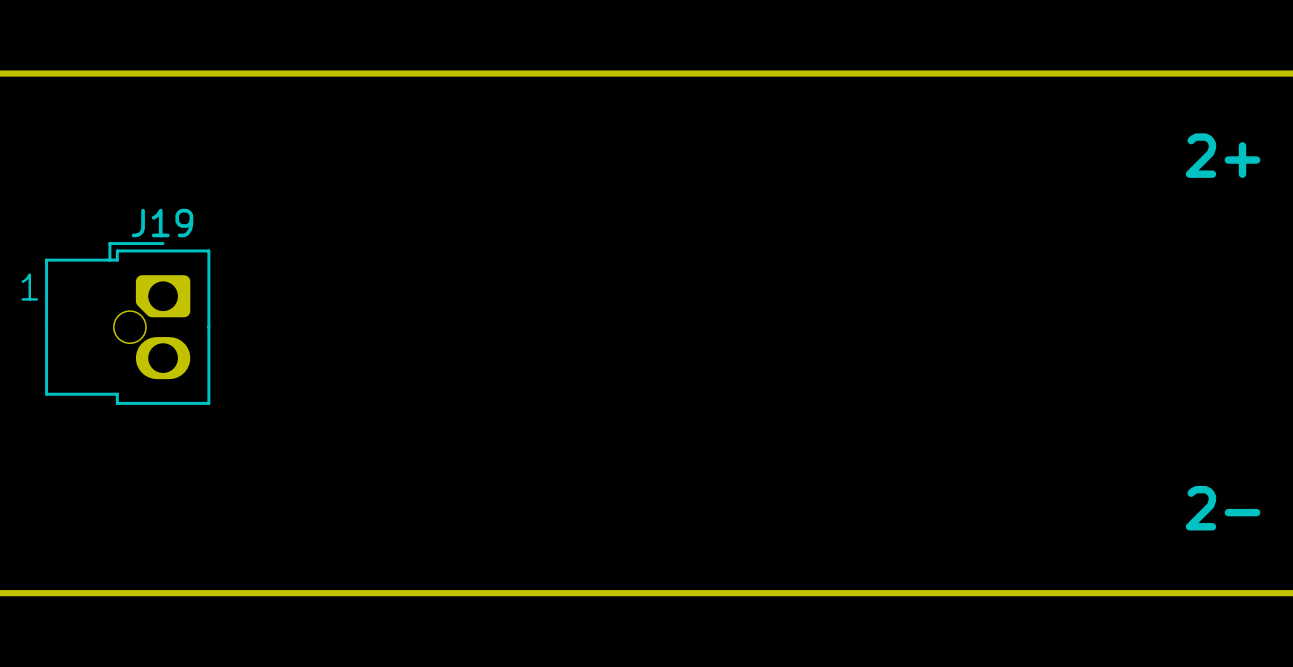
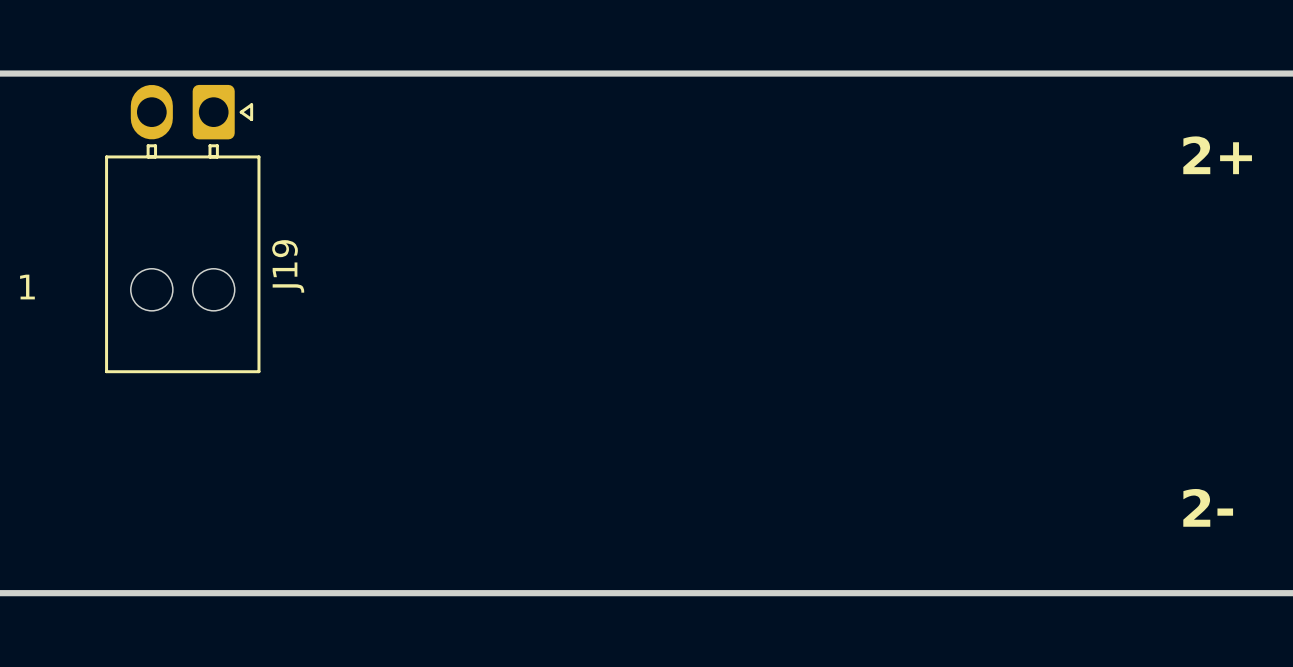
J19 name position: J19 (162, 223) -> J19 (288, 266)
J19 footprint: [45, 242, 211, 405] -> [105, 84, 261, 374]

